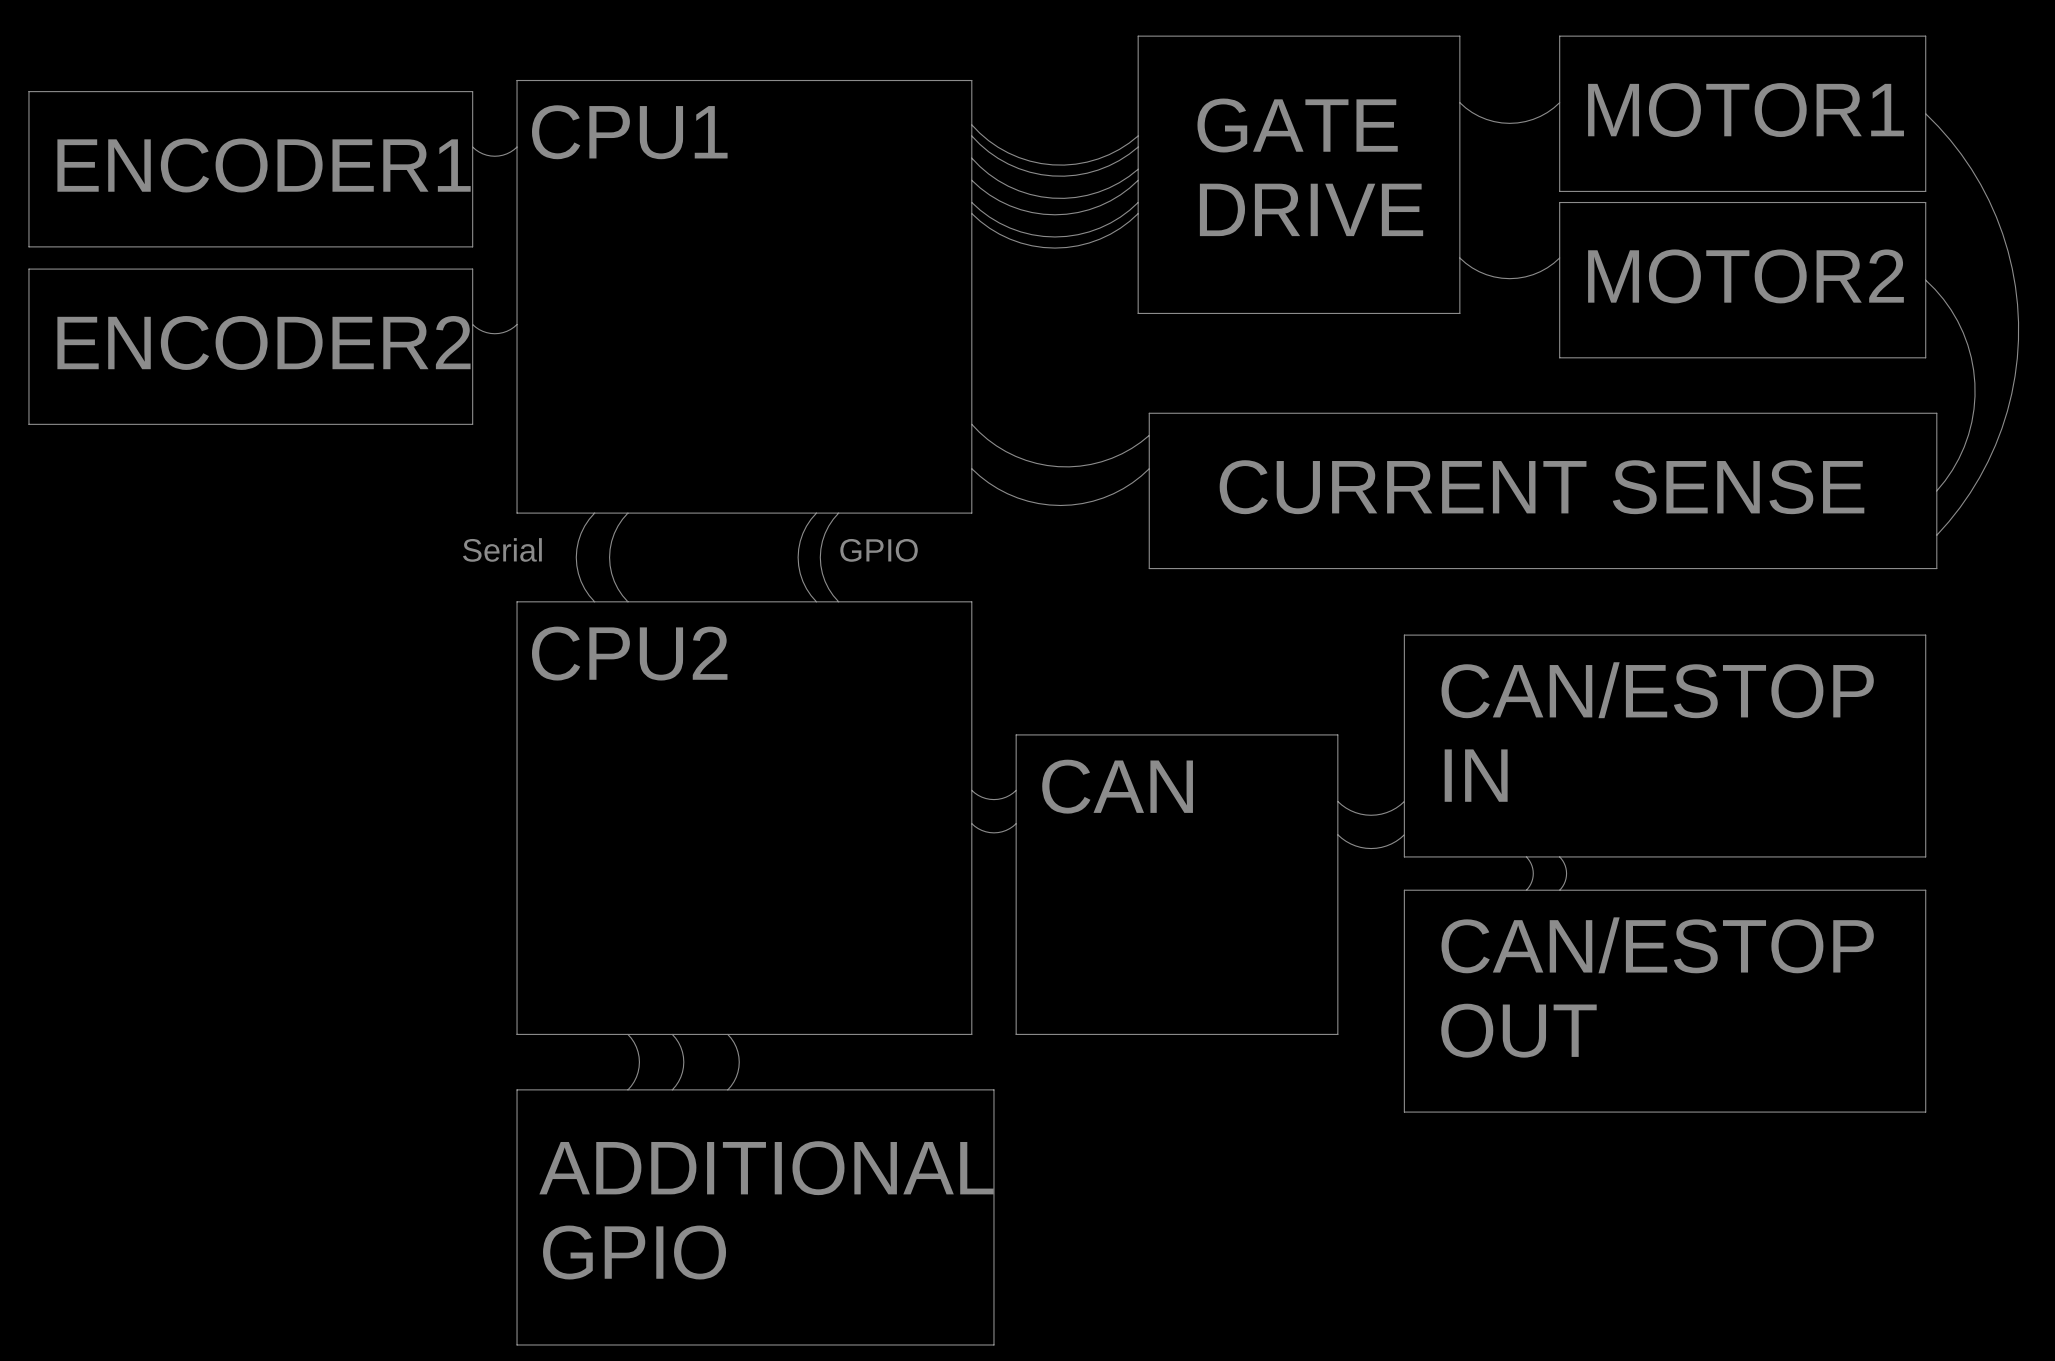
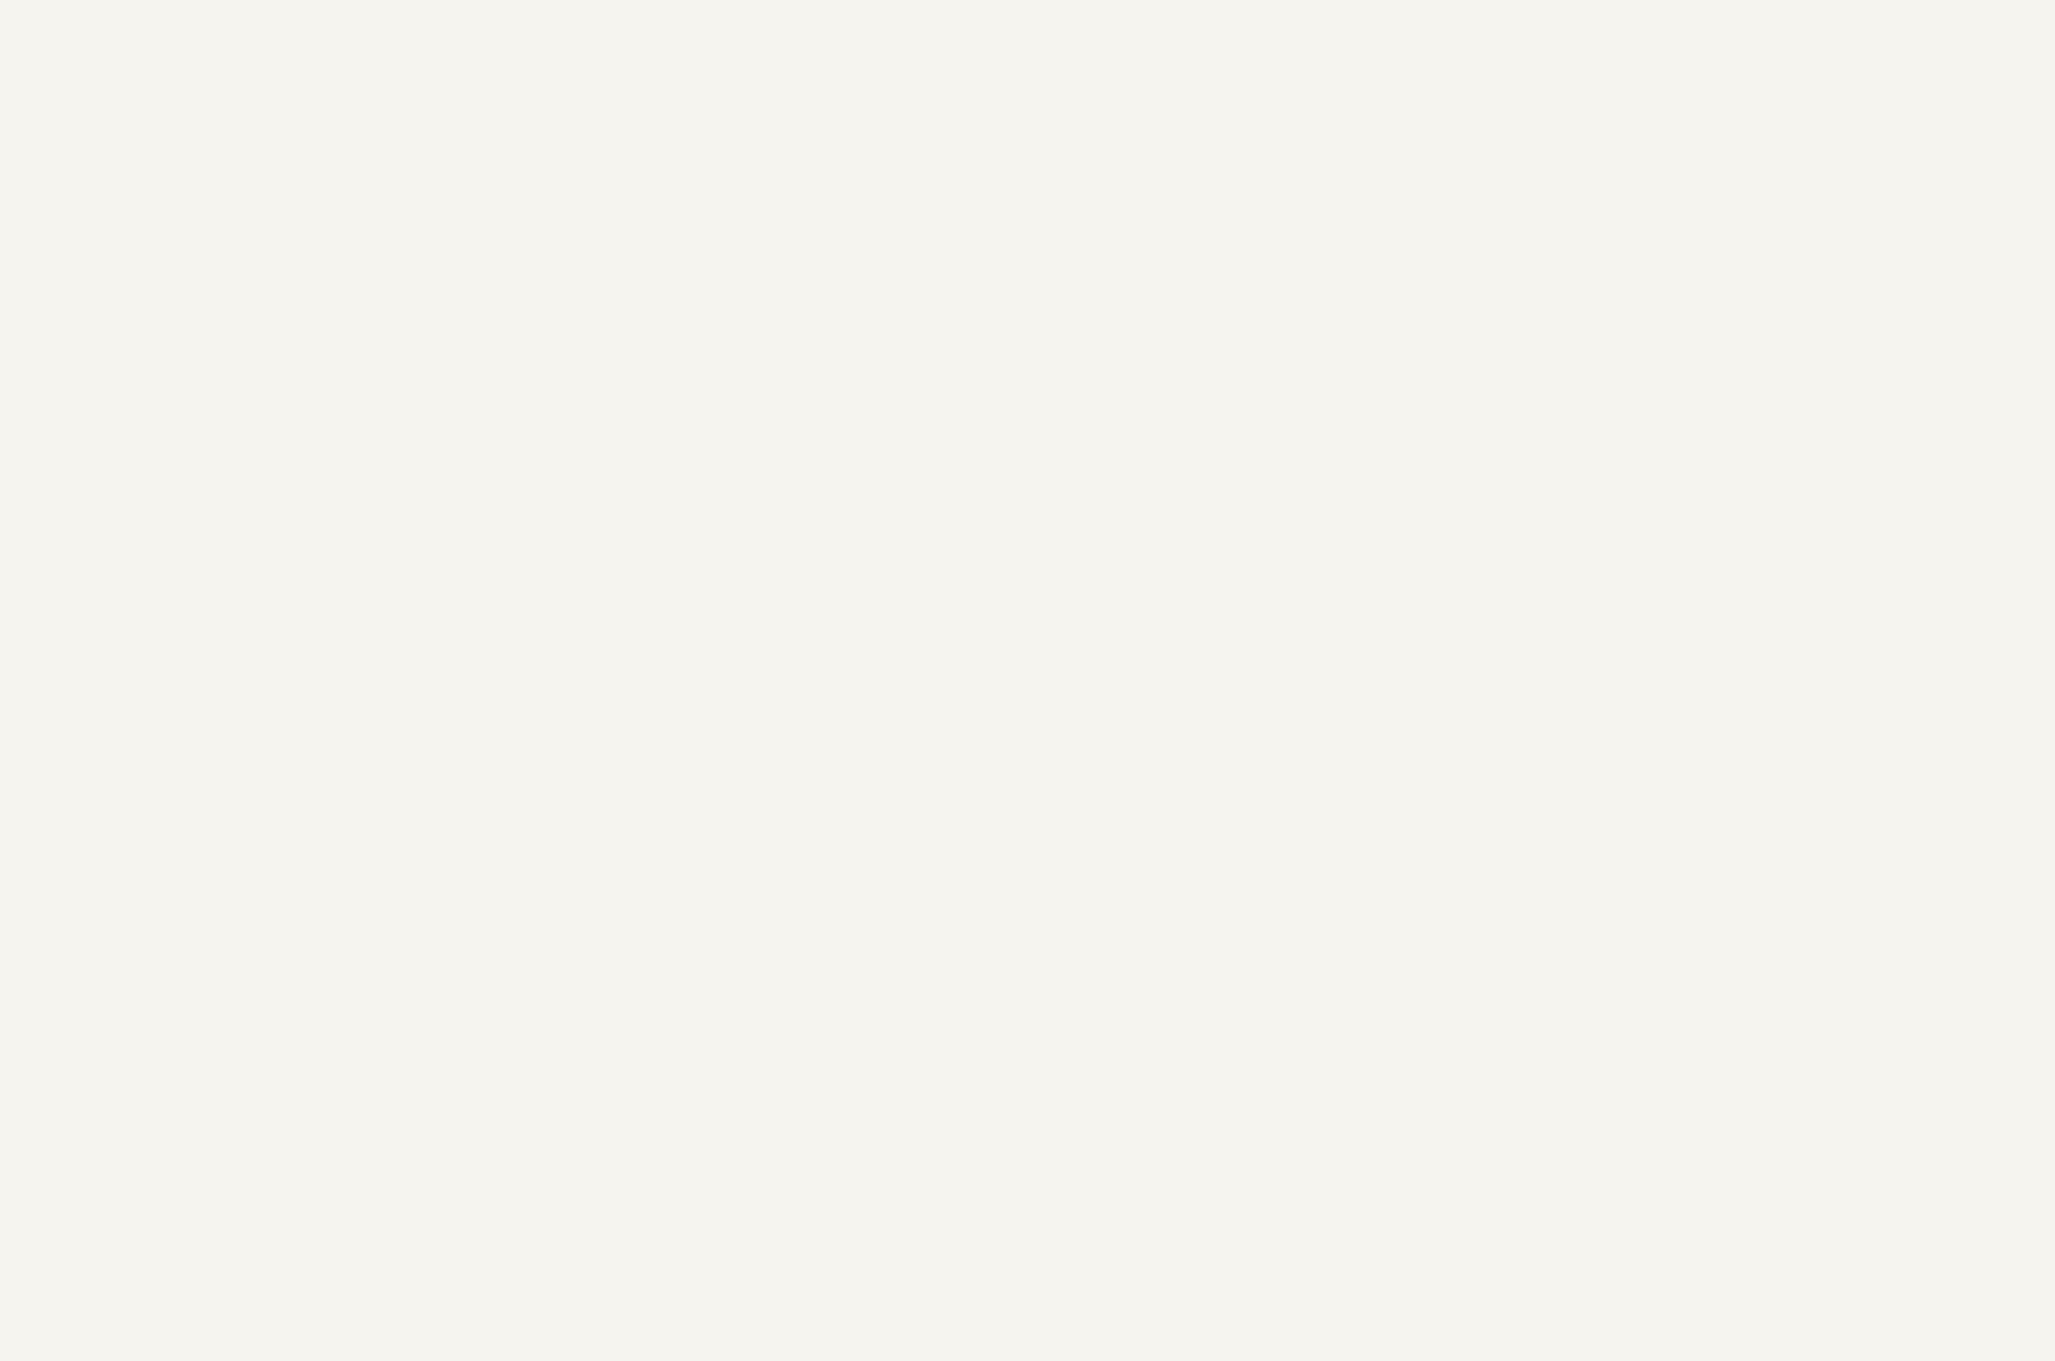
line: (1138, 36) (1459, 36) (1459, 313) (1138, 313) (1138, 36) -> none
line: (1559, 36) (1925, 36) (1925, 191) (1559, 191) (1559, 36) -> none
line: (517, 80) (517, 513) (971, 513) (971, 80) (517, 80) -> none
line: (28, 91) (28, 246) (472, 246) (472, 91) (28, 91) -> none
line: (1459, 102) (1479, 116) (1494, 121) (1509, 123) (1525, 121) (1540, 116) (1559, 102) -> none
text: MOTOR1 (1746, 110) -> none
line: (1925, 113) (1961, 154) (1980, 184) (1996, 217) (2012, 268) (2018, 322) (2015, 376) (2001, 428) (1979, 477) (1959, 507) (1936, 535) -> none
line: (971, 124) (988, 140) (1008, 152) (1029, 161) (1052, 164) (1075, 164) (1098, 158) (1119, 149) (1138, 135) -> none
text: GATE (1297, 125) -> none
text: CPU1 (629, 132) -> none
line: (971, 135) (988, 151) (1008, 164) (1029, 172) (1052, 175) (1075, 175) (1098, 170) (1119, 160) (1138, 147) -> none
line: (472, 147) (482, 153) (494, 156) (506, 153) (517, 147) -> none
line: (971, 158) (988, 173) (1008, 186) (1029, 194) (1052, 198) (1075, 197) (1098, 192) (1119, 182) (1138, 169) -> none
text: ENCODER1 (264, 165) -> none
line: (971, 180) (989, 194) (1009, 205) (1032, 212) (1054, 214) (1077, 212) (1100, 205) (1120, 194) (1138, 180) -> none
line: (971, 202) (989, 217) (1009, 228) (1032, 234) (1054, 236) (1077, 234) (1100, 228) (1120, 217) (1138, 202) -> none
line: (1559, 202) (1559, 357) (1925, 357) (1925, 202) (1559, 202) -> none
text: DRIVE (1311, 209) -> none
line: (971, 213) (989, 228) (1009, 239) (1032, 245) (1054, 248) (1077, 245) (1100, 239) (1120, 228) (1138, 213) -> none
line: (1459, 257) (1479, 271) (1494, 276) (1509, 278) (1525, 276) (1540, 271) (1559, 257) -> none
line: (28, 269) (472, 269) (472, 424) (28, 424) (28, 269) -> none
text: MOTOR2 (1745, 276) -> none
line: (1925, 280) (1943, 299) (1963, 332) (1971, 357) (1974, 383) (1973, 409) (1968, 434) (1958, 458) (1936, 490) -> none
line: (472, 324) (482, 331) (494, 333) (506, 331) (517, 324) -> none
text: ENCODER2 (264, 342) -> none
line: (1149, 413) (1936, 413) (1936, 568) (1149, 568) (1149, 413) -> none
line: (971, 424) (987, 439) (1015, 456) (1036, 463) (1058, 466) (1090, 464) (1112, 458) (1131, 448) (1149, 435) -> none
line: (971, 468) (997, 488) (1017, 497) (1038, 503) (1060, 505) (1082, 503) (1103, 497) (1132, 482) (1149, 468) -> none
text: CURRENT SENSE (1542, 487) -> none
line: (594, 513) (581, 533) (576, 557) (581, 581) (594, 601) -> none
line: (627, 513) (614, 533) (609, 557) (614, 581) (627, 601) -> none
line: (816, 513) (802, 533) (798, 557) (802, 581) (816, 601) -> none
line: (838, 513) (825, 533) (820, 557) (825, 581) (838, 601) -> none
text: Serial (502, 549) -> none
text: GPIO (879, 550) -> none
line: (517, 601) (971, 601) (971, 1034) (517, 1034) (517, 601) -> none
line: (1404, 635) (1925, 635) (1925, 856) (1404, 856) (1404, 635) -> none
text: CPU2 (629, 653) -> none
text: CAN/ESTOP (1657, 690) -> none
line: (1016, 734) (1337, 734) (1337, 1034) (1016, 1034) (1016, 734) -> none
text: IN (1476, 775) -> none
text: CAN (1117, 786) -> none
line: (971, 790) (981, 797) (993, 799) (1005, 797) (1016, 790) -> none
line: (1337, 801) (1355, 812) (1371, 815) (1386, 812) (1404, 801) -> none
line: (971, 823) (981, 830) (993, 832) (1005, 830) (1016, 823) -> none
line: (1337, 834) (1355, 845) (1371, 848) (1391, 843) (1404, 834) -> none
line: (1526, 856) (1531, 865) (1533, 873) (1531, 881) (1526, 890) -> none
line: (1559, 856) (1565, 865) (1566, 873) (1565, 881) (1559, 890) -> none
line: (1404, 890) (1404, 1112) (1925, 1112) (1925, 890) (1404, 890) -> none
text: CAN/ESTOP (1657, 945) -> none
text: OUT (1518, 1030) -> none
line: (627, 1034) (636, 1047) (639, 1062) (636, 1077) (627, 1089) -> none
line: (672, 1034) (680, 1047) (683, 1062) (680, 1077) (672, 1089) -> none
line: (727, 1034) (736, 1047) (739, 1062) (736, 1077) (727, 1089) -> none
line: (517, 1089) (517, 1344) (993, 1344) (993, 1089) (517, 1089) -> none
text: ADDITIONAL (766, 1168) -> none
text: GPIO (634, 1252) -> none

